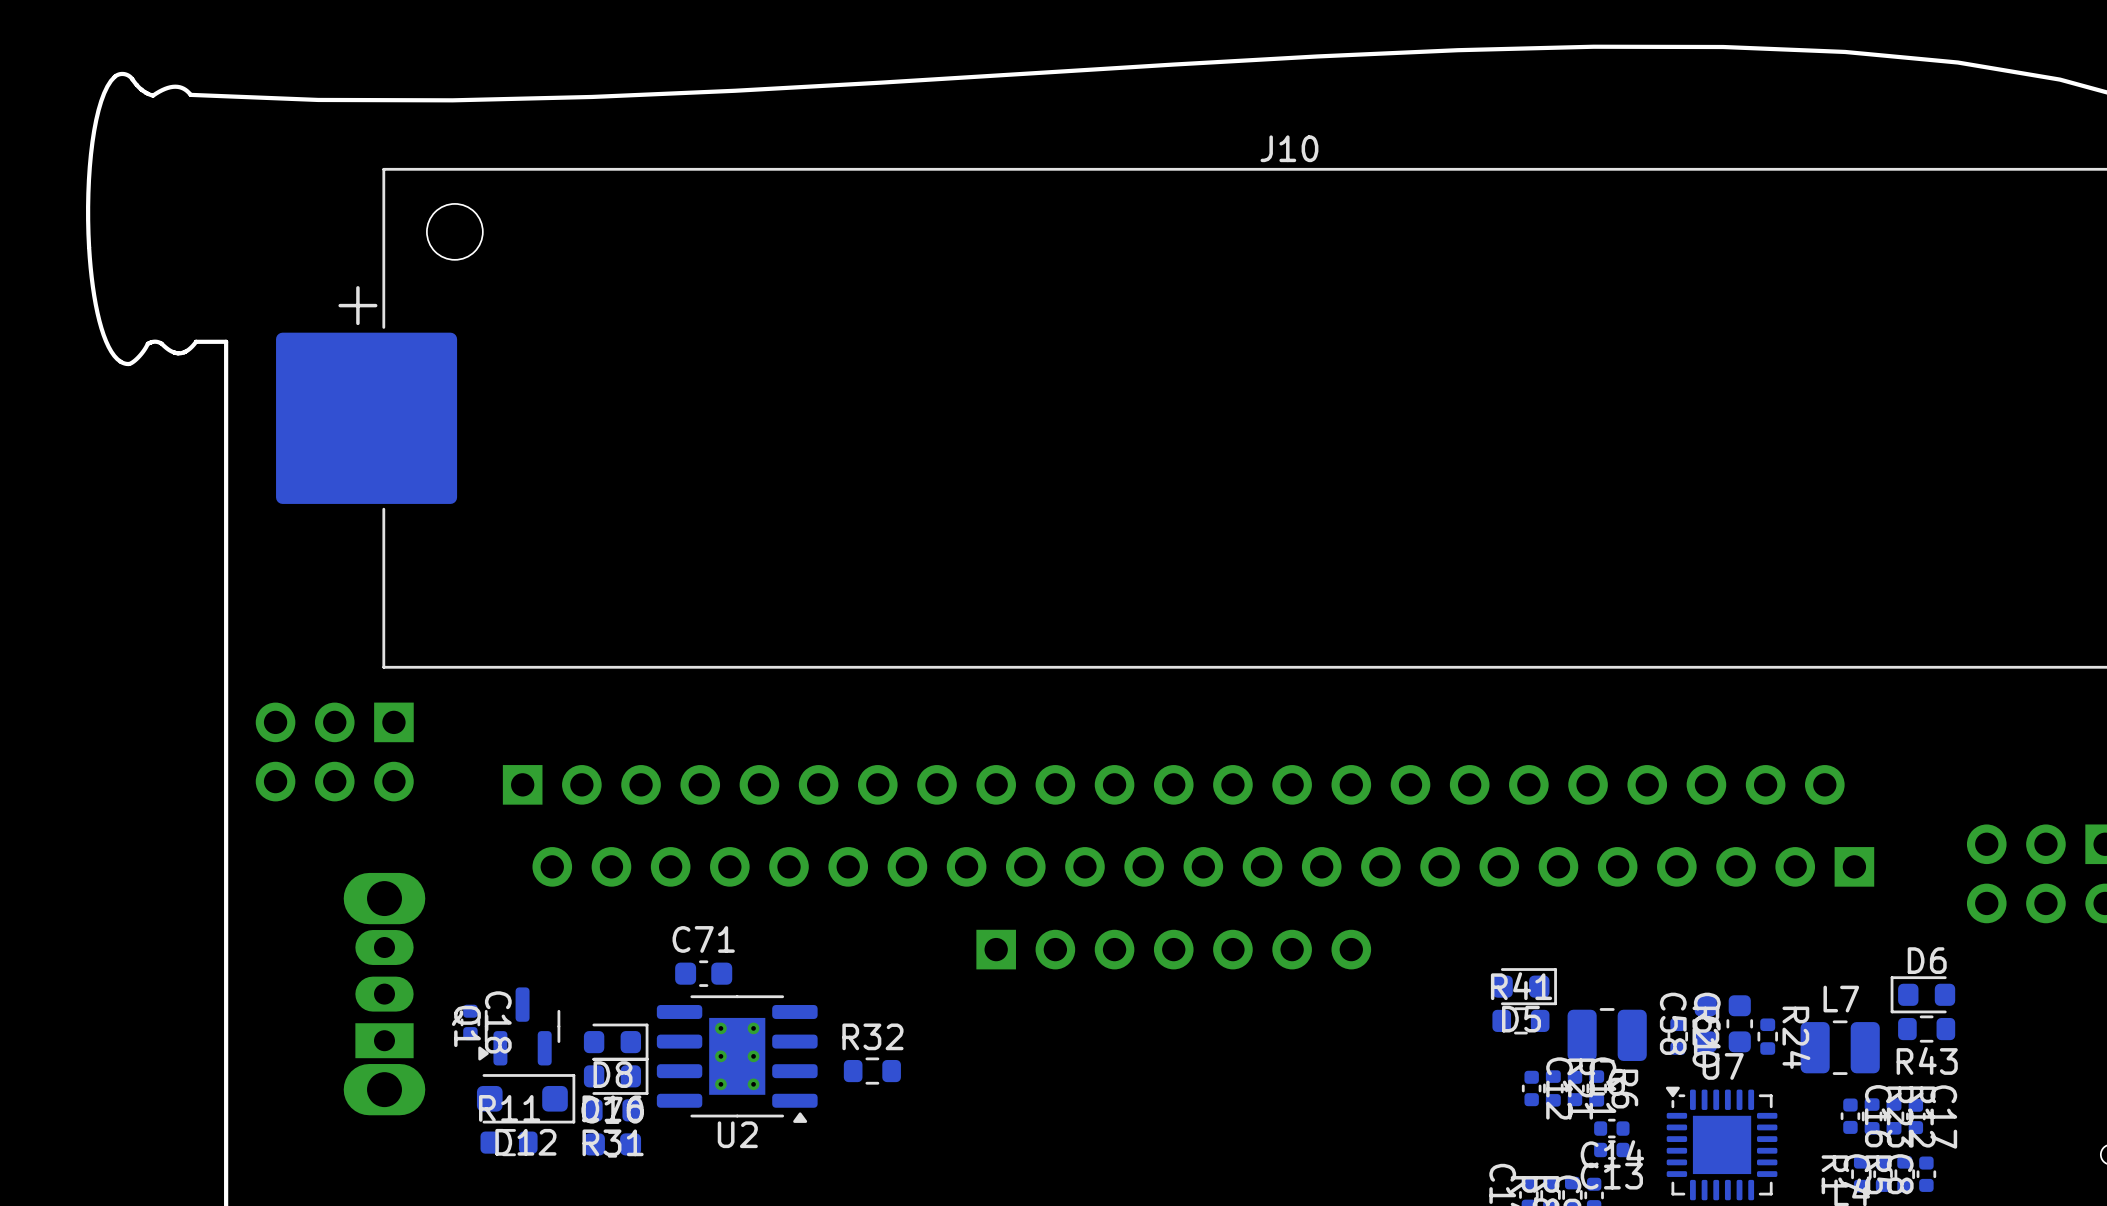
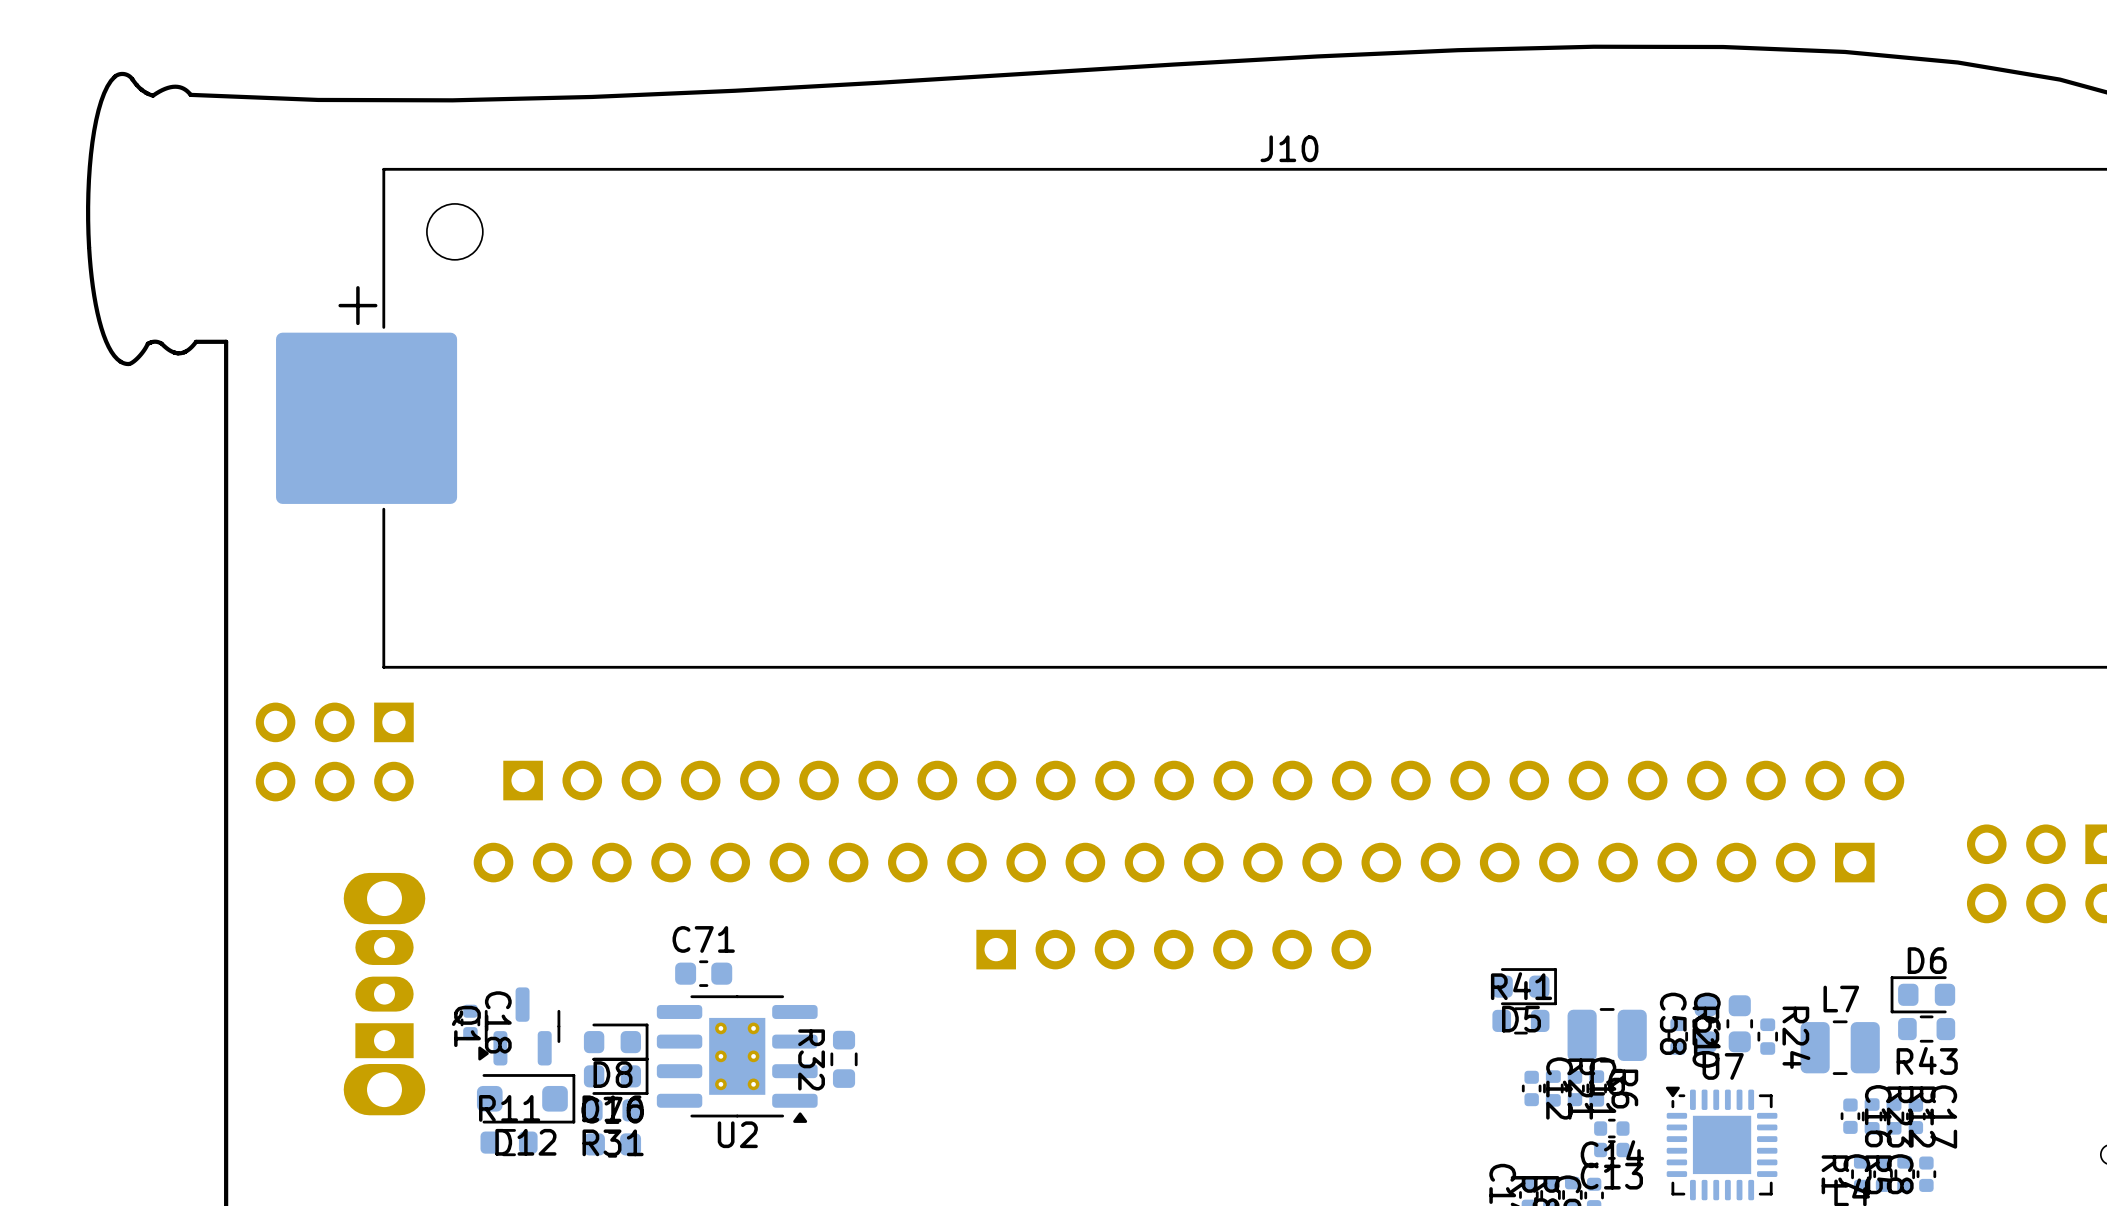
part: none -> (1203, 780)
part: (1173, 784) -> none
part: none -> (1174, 862)
part: (1203, 866) -> none
R32 name position: R32 (872, 1036) -> R32 (811, 1059)
R32 rotation: 0° (872, 1071) -> 90° clockwise (844, 1059)

